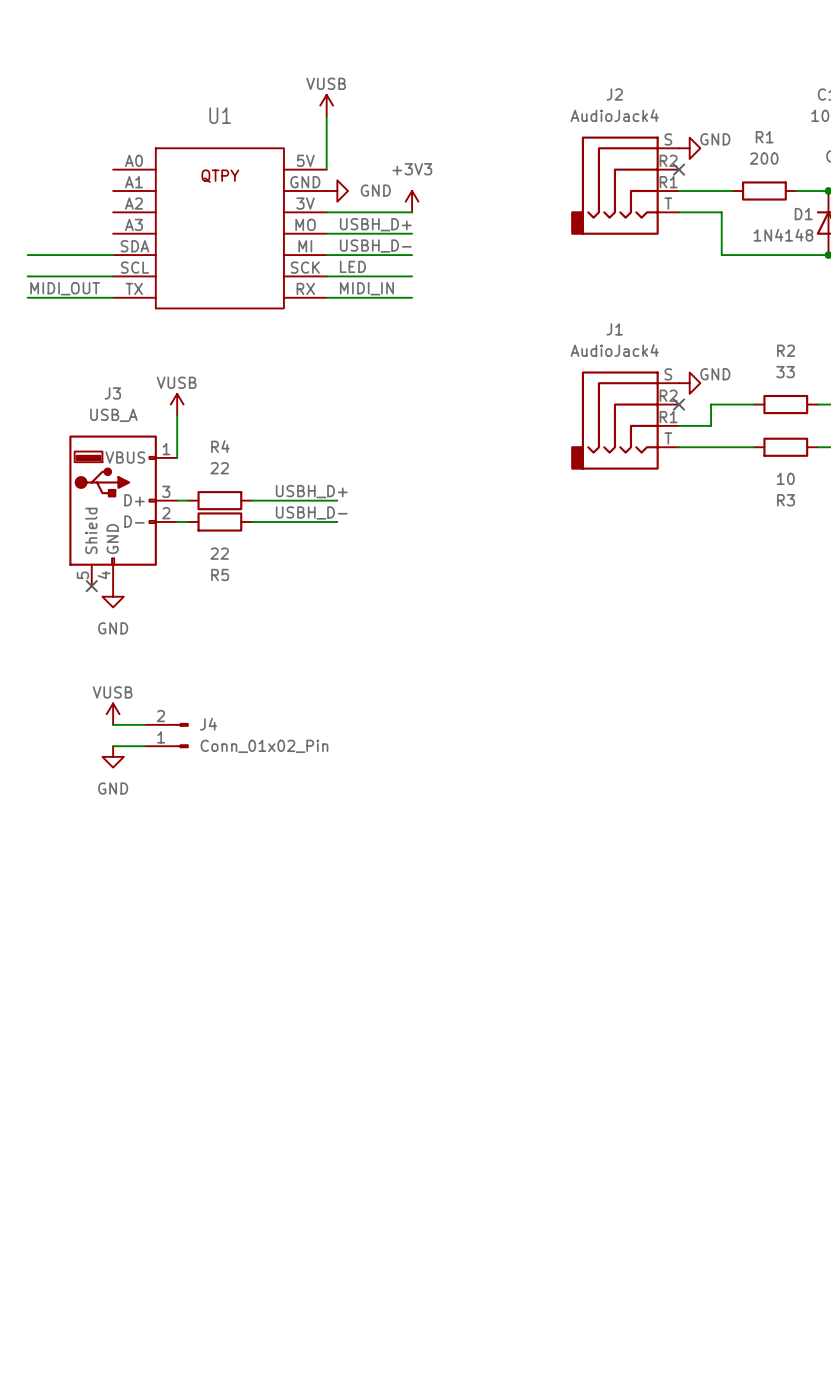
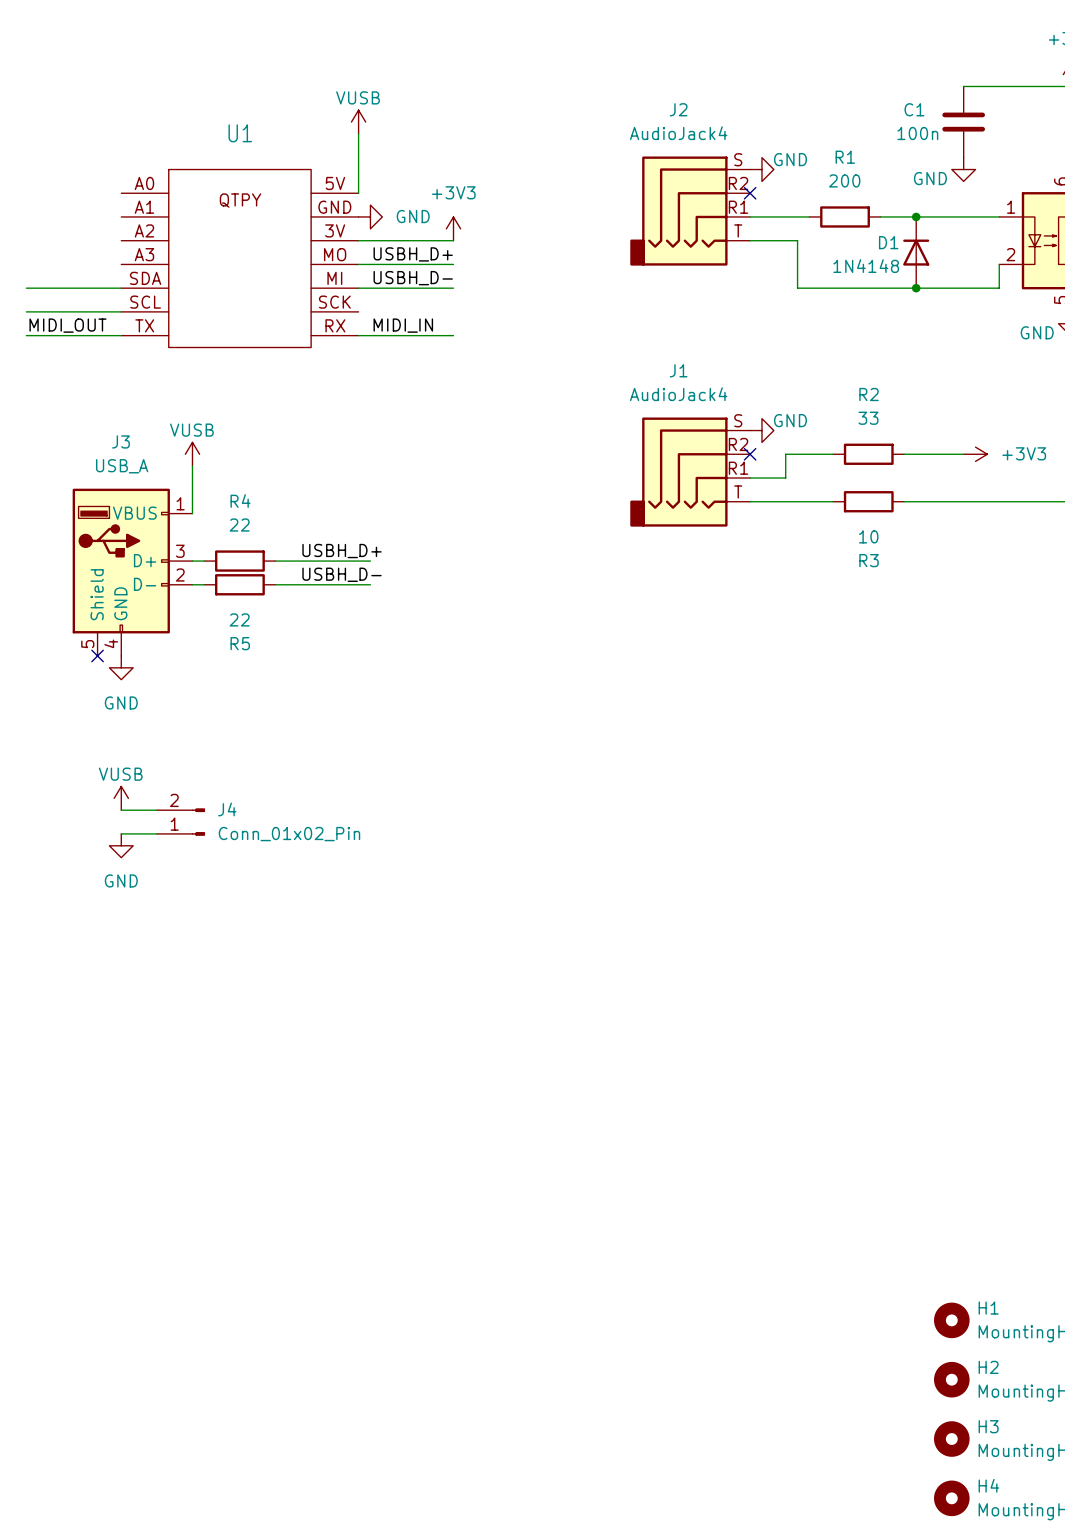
label: LED (352, 266) -> none
wire: (326, 276) (412, 276) -> none

